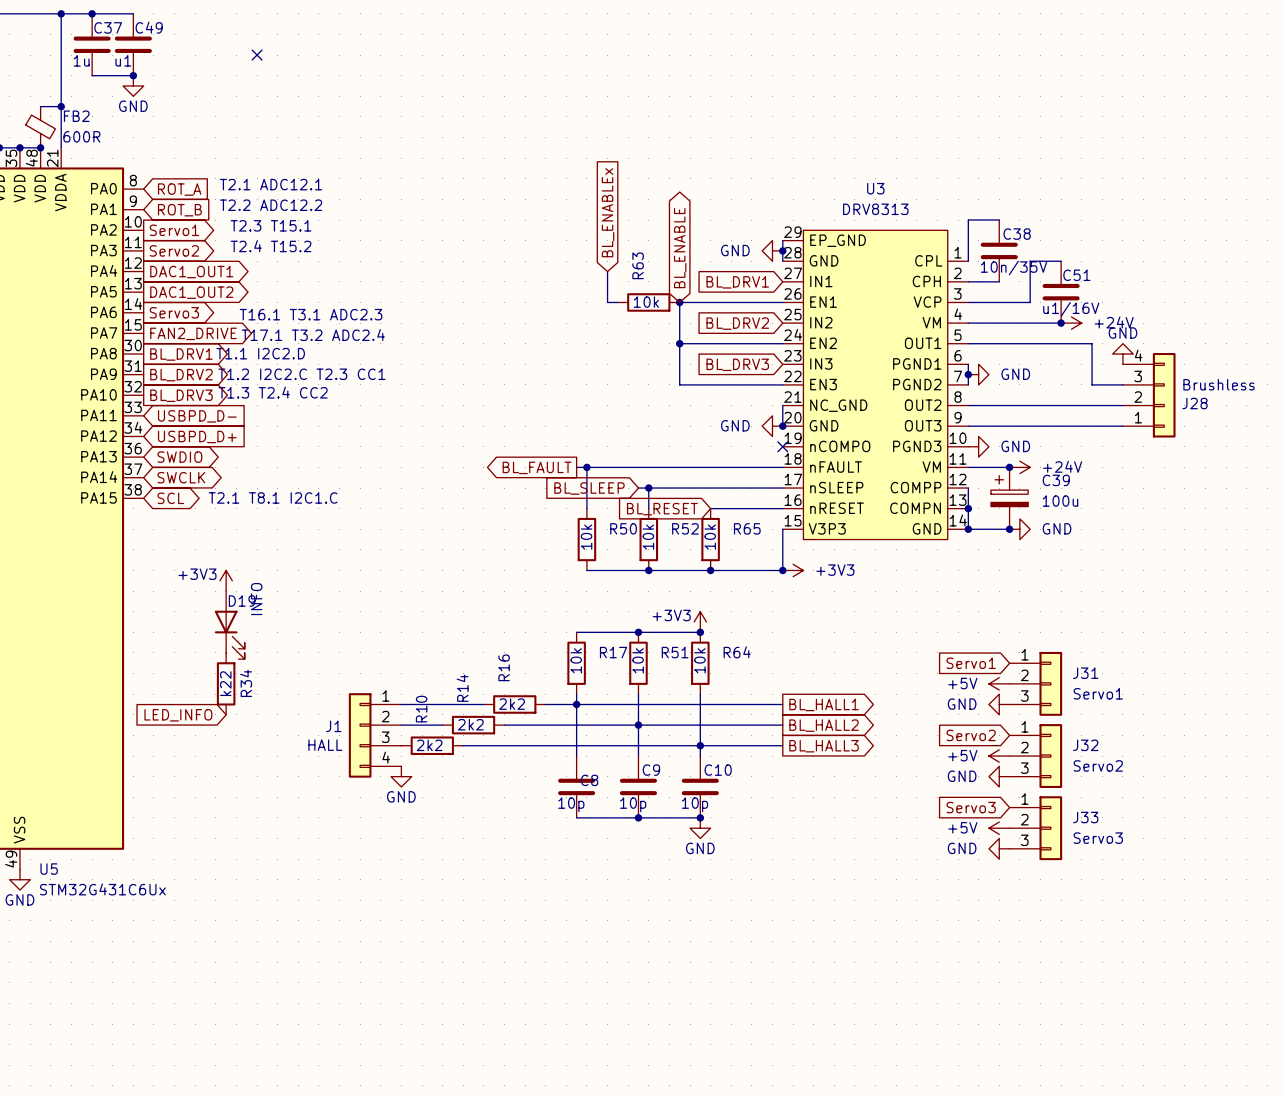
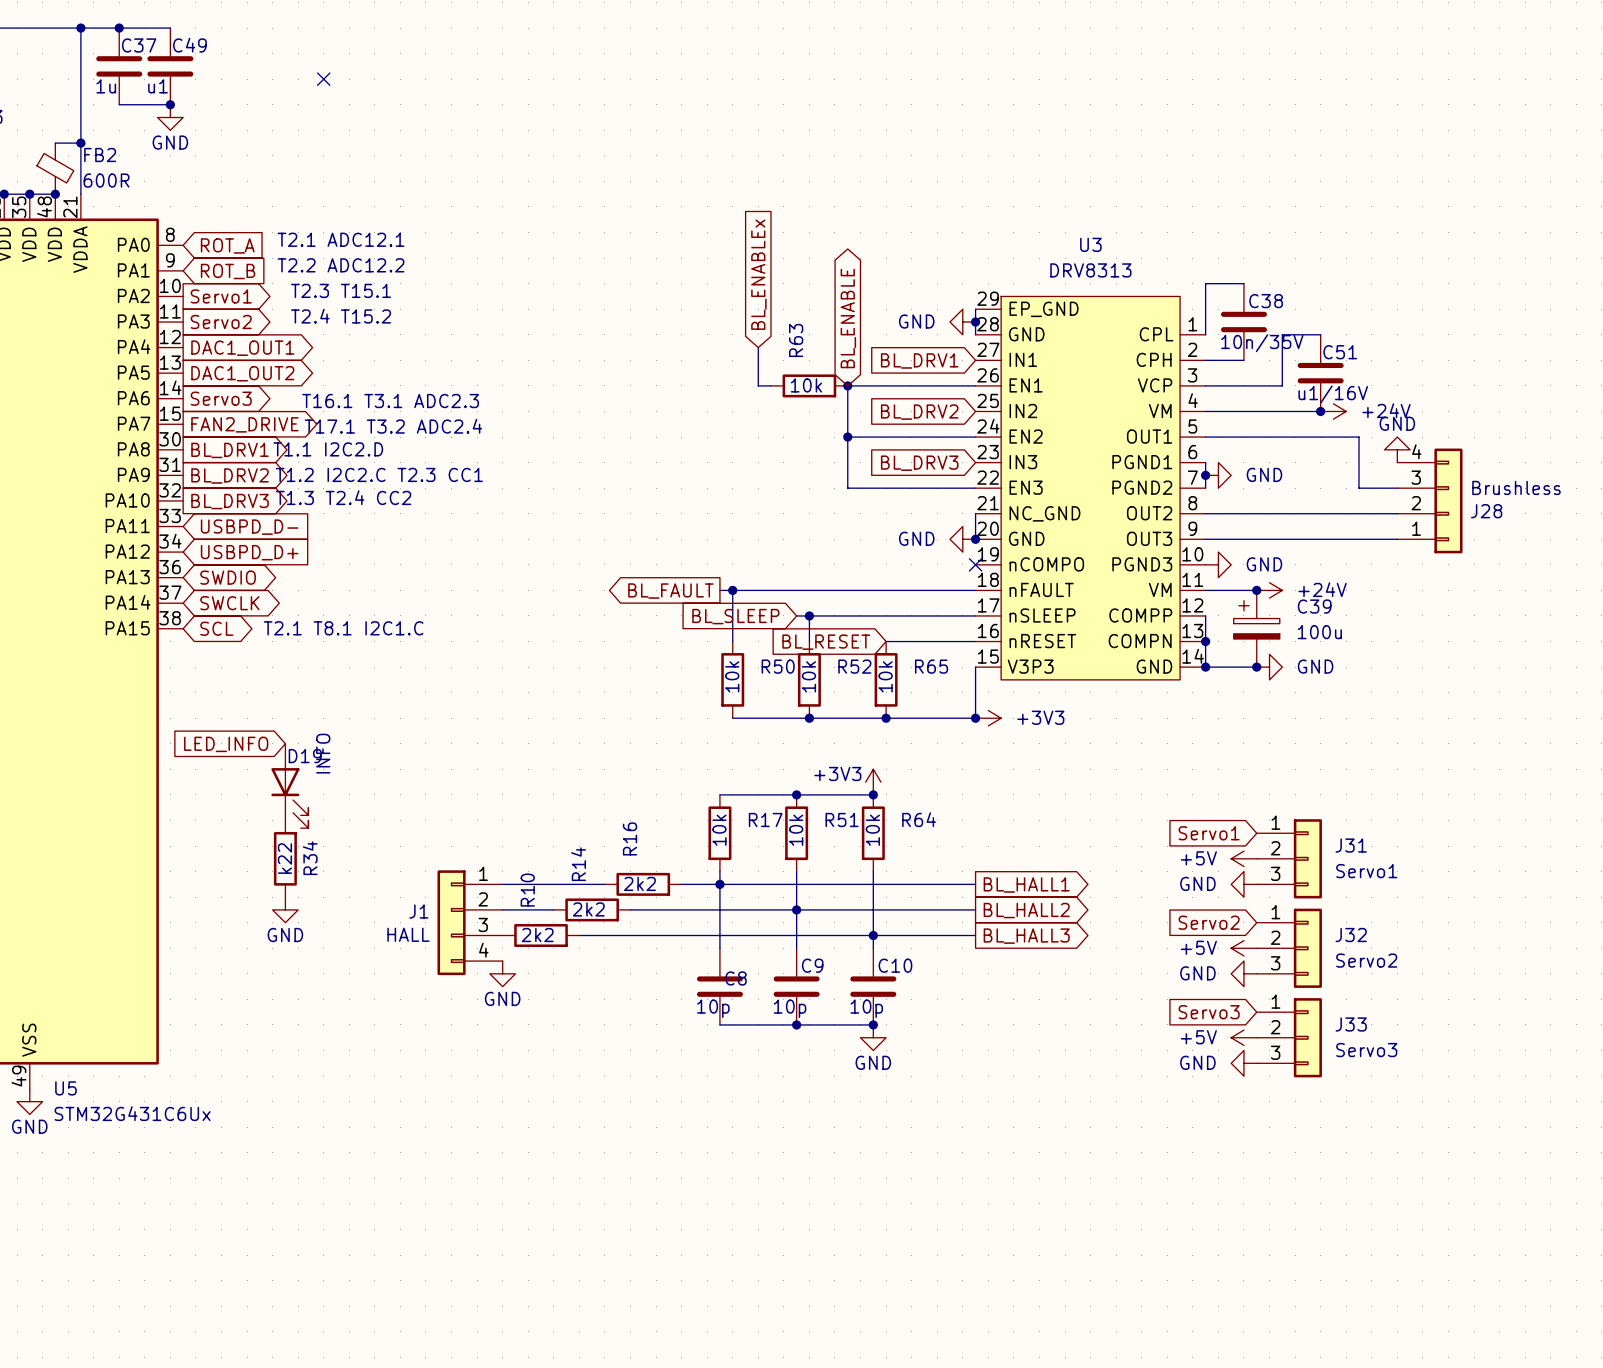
power symbol: +3V3 (226, 580) -> none
global label position: LED_INFO (178, 715) -> LED_INFO (226, 744)
power symbol: none -> GND (285, 909)

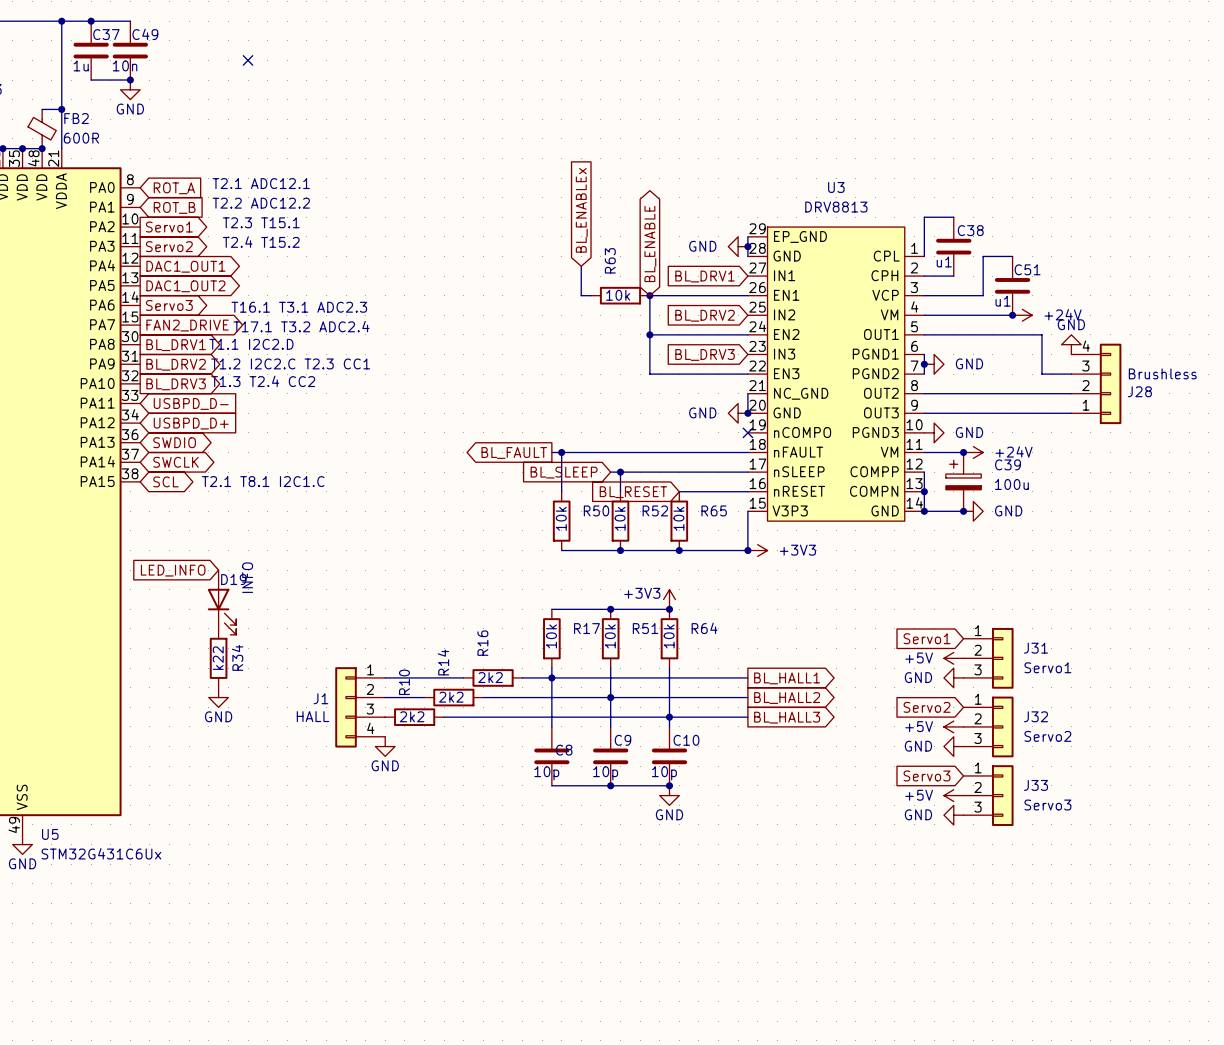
C49 value: u1 (157, 86) -> 10n (125, 65)
U3 value: DRV8313 (1090, 270) -> DRV8813 (836, 207)
C38 value: 10n/35V (1262, 343) -> u1 (944, 261)
C51 value: u1/16V (1333, 394) -> u1 (1003, 301)

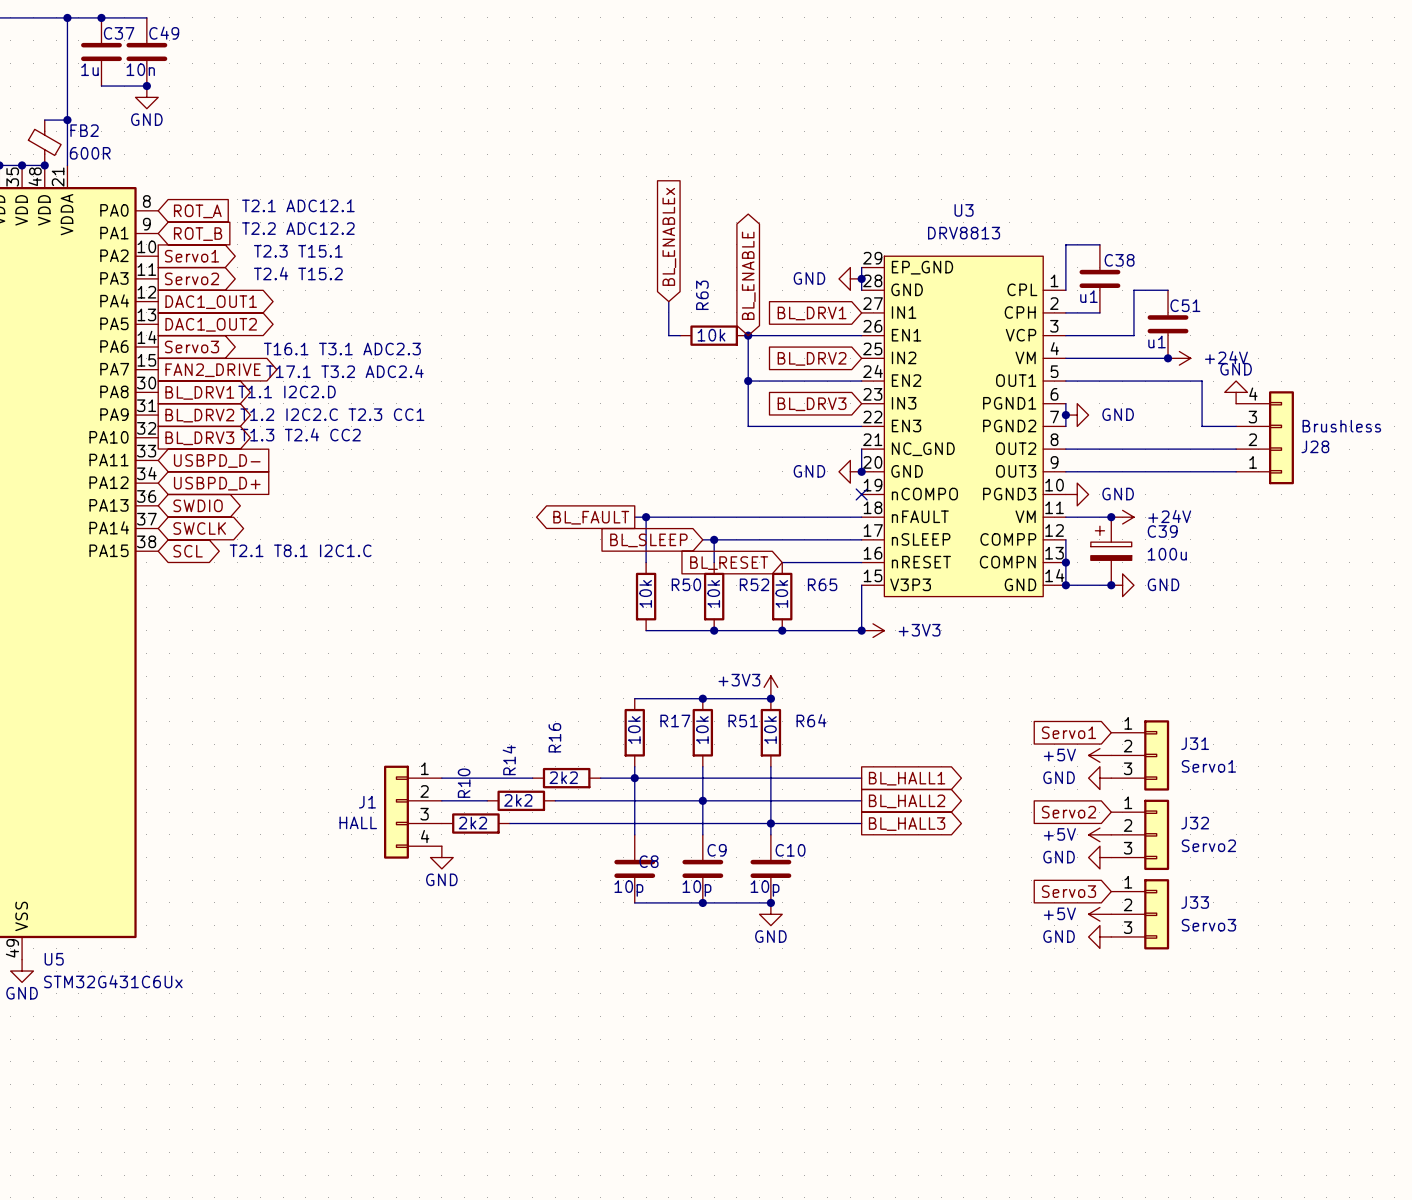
no-connect mark: (248, 60) -> none
global label: LED_INFO (173, 570) -> none
D19: INFO (222, 602) -> none
R34: k22 (218, 658) -> none
power symbol: GND (218, 697) -> none

